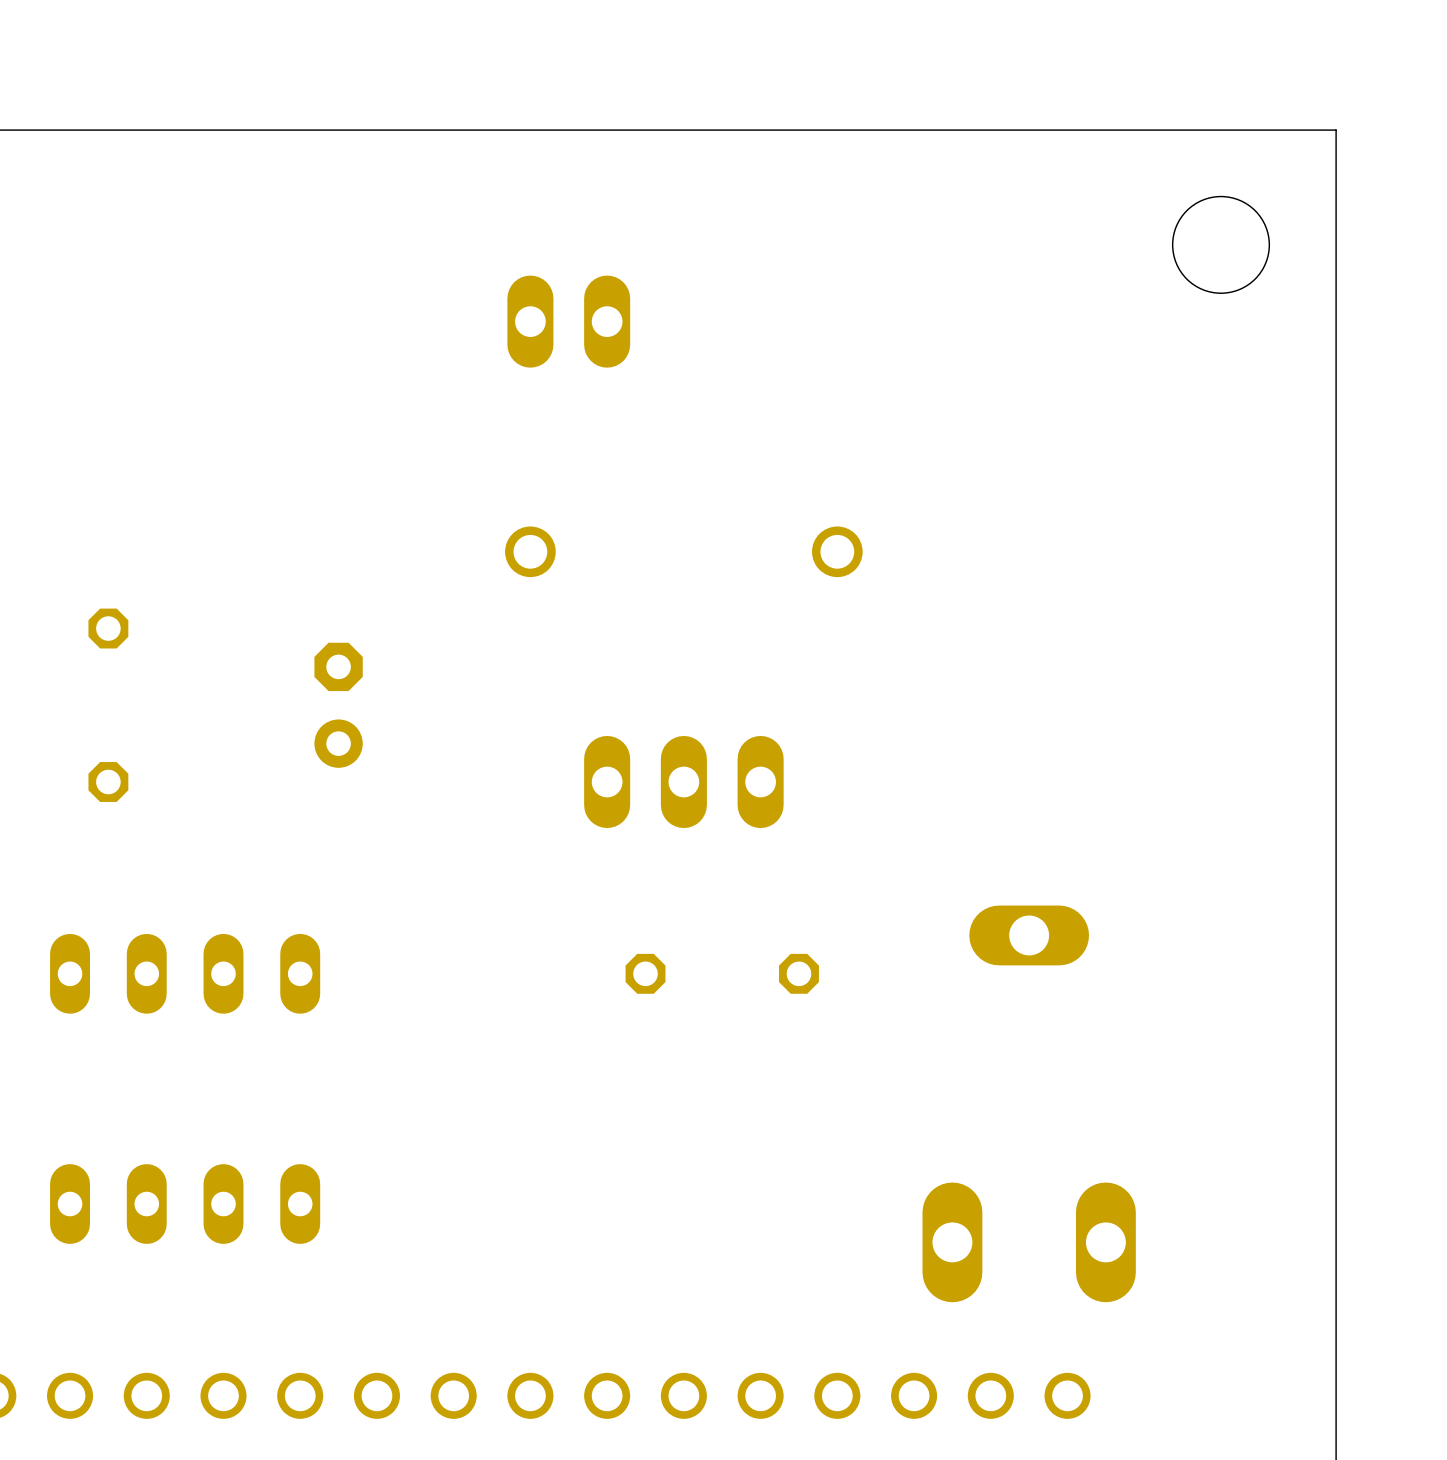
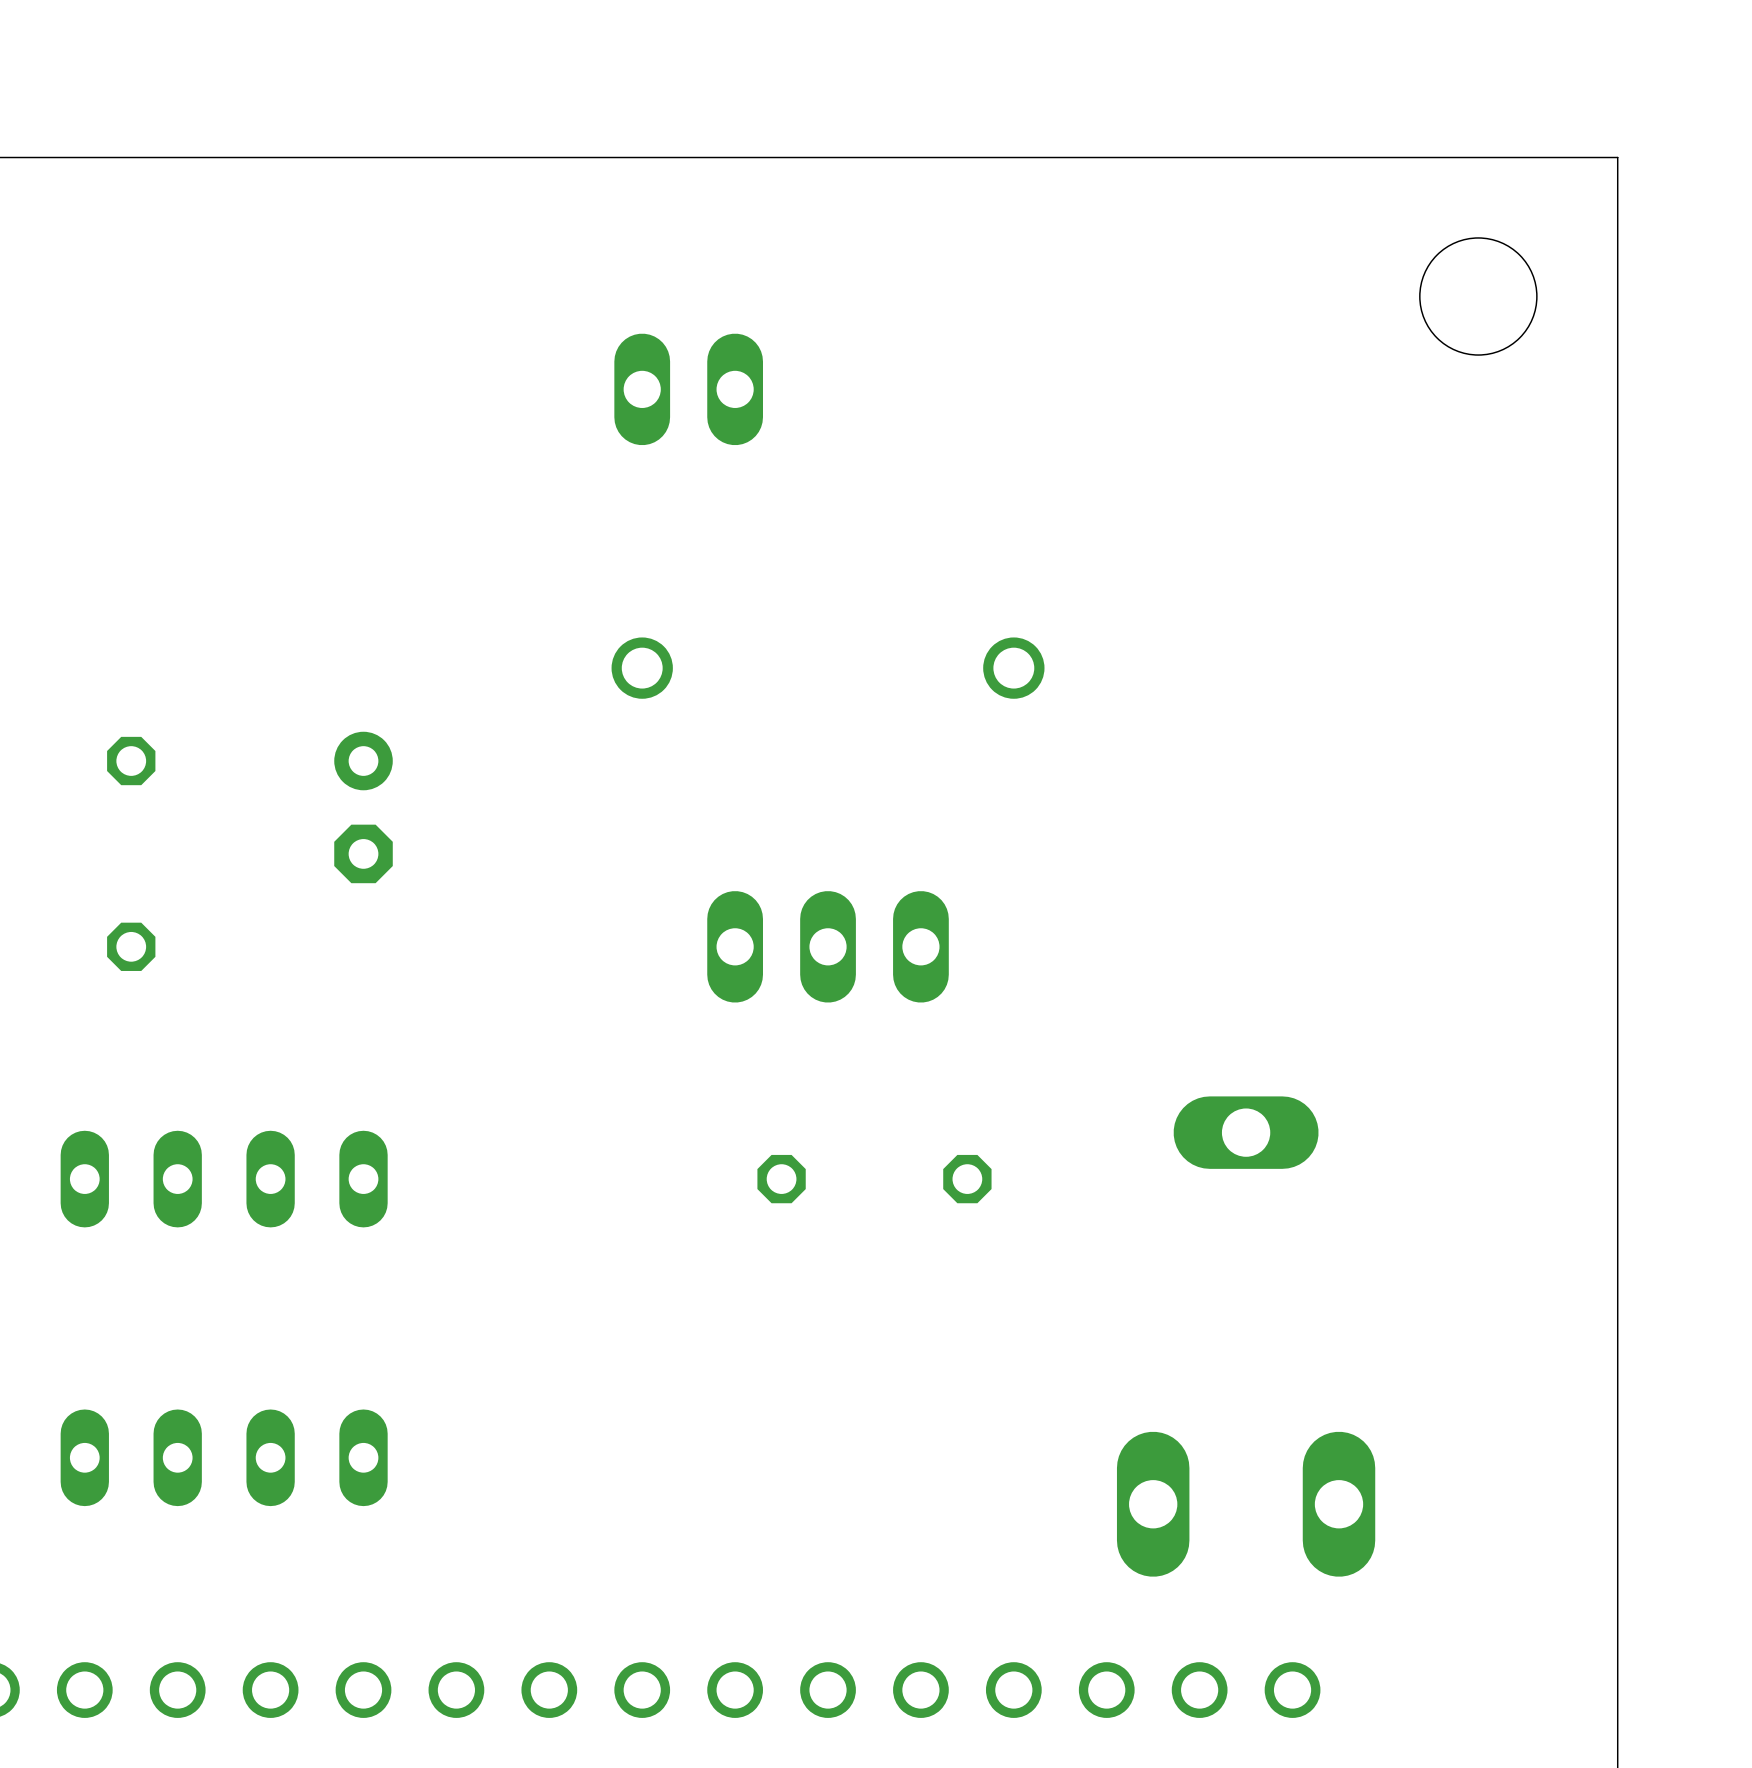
part rotation: 0° (338, 705) -> 180° (363, 807)

